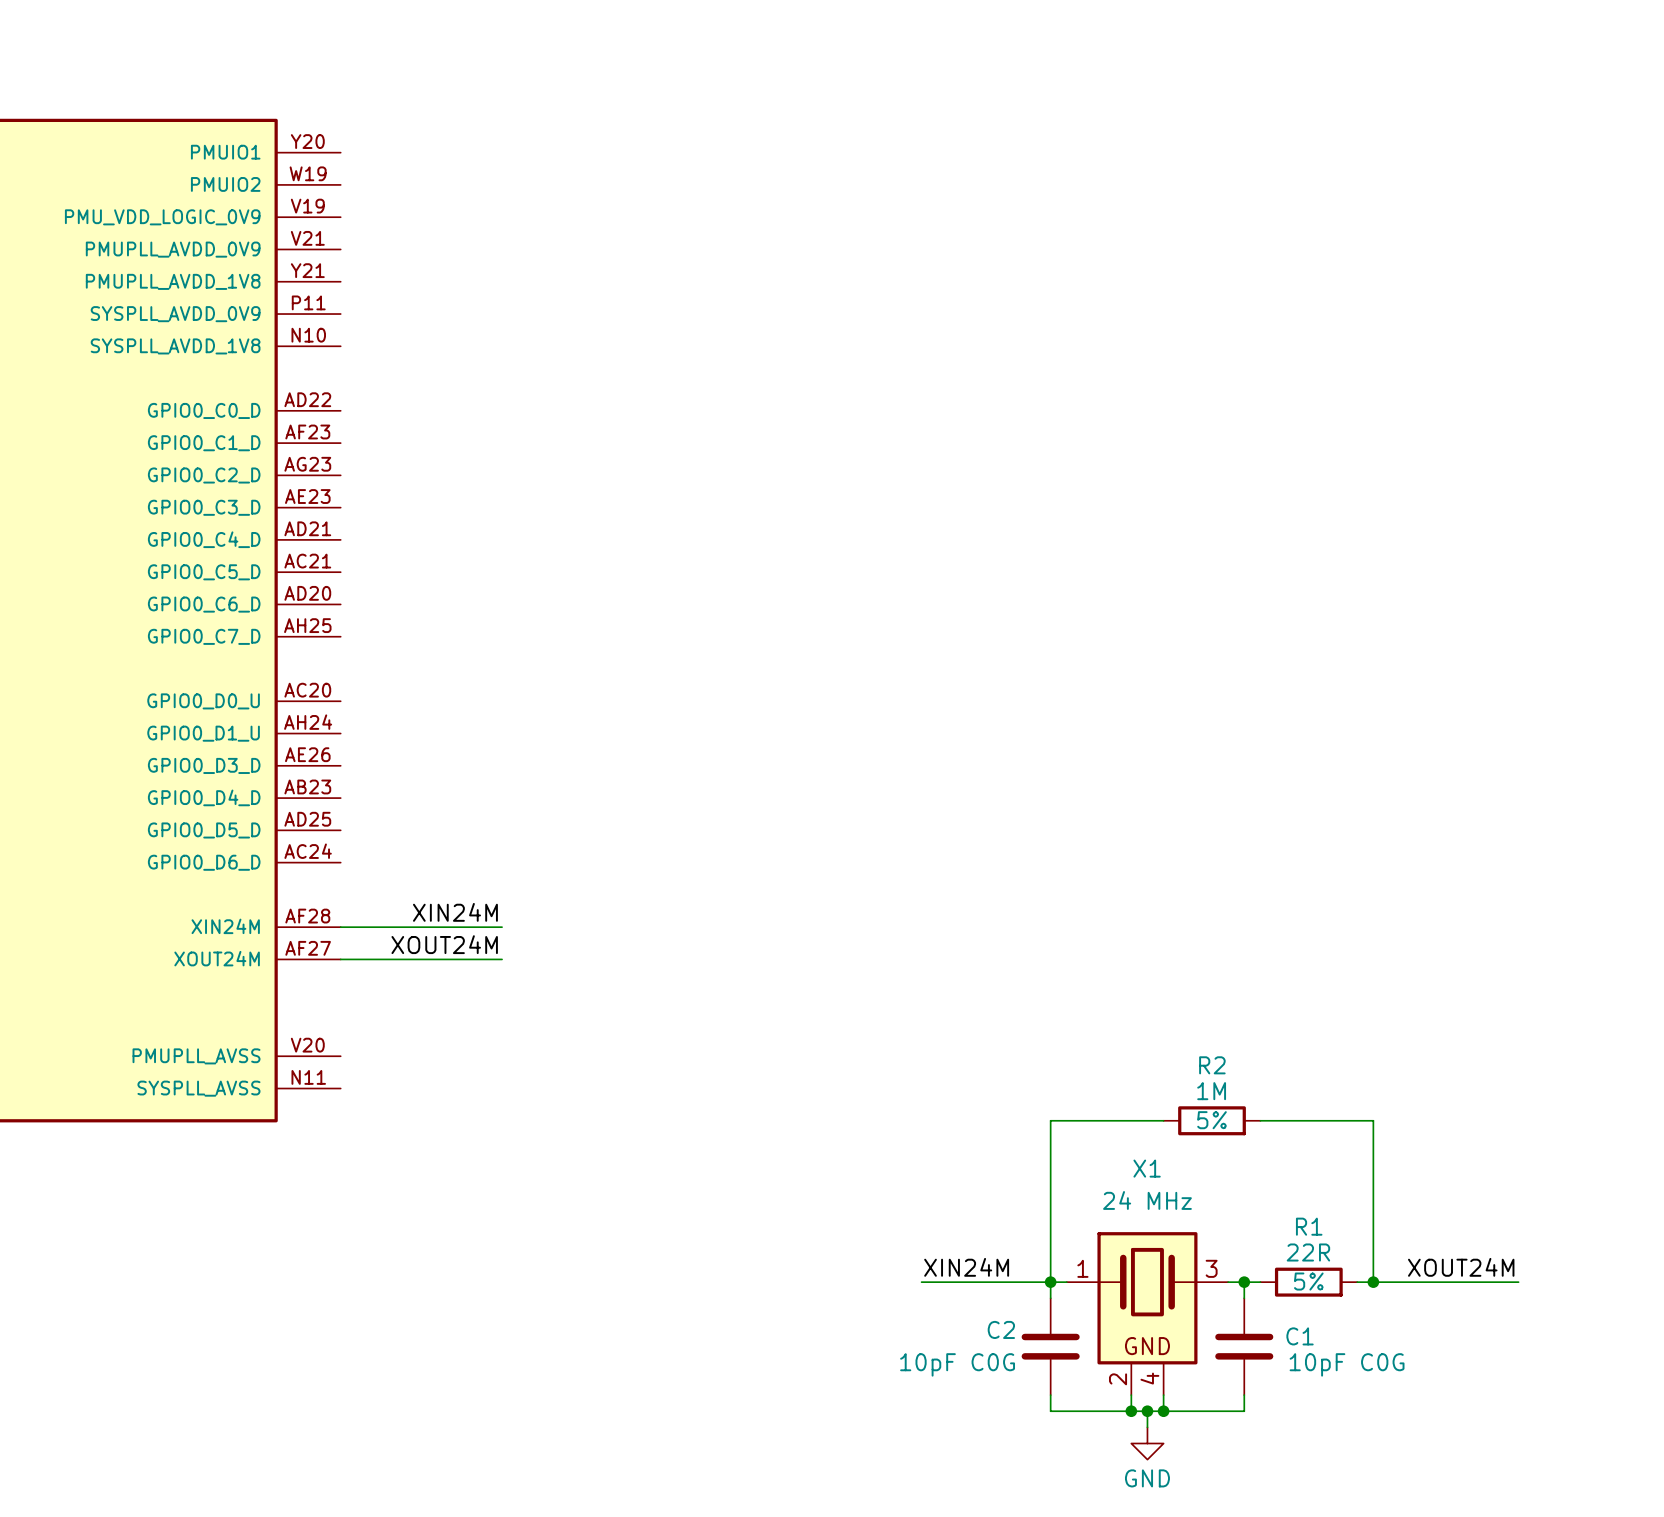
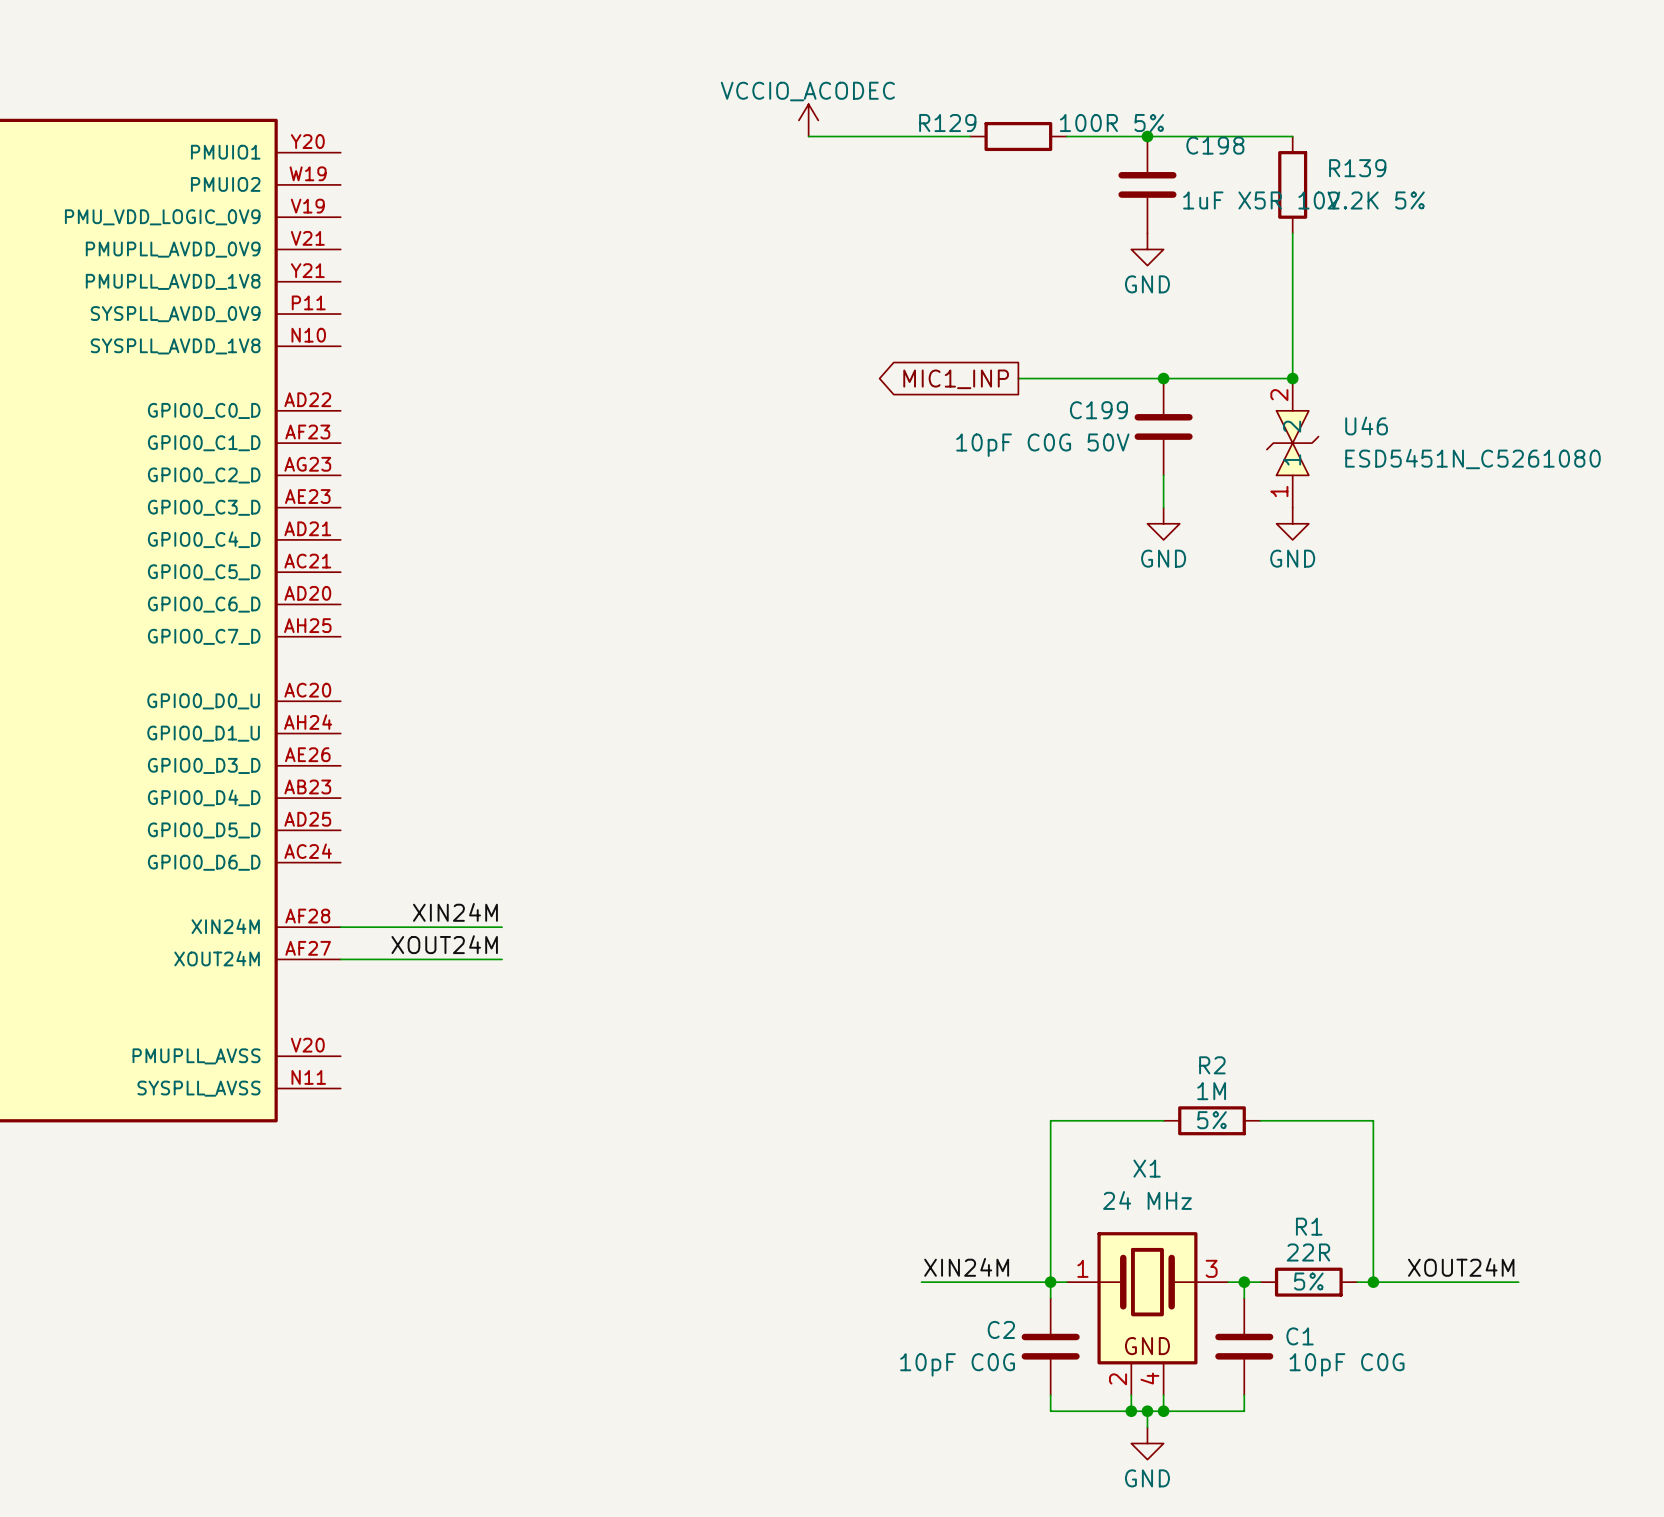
power symbol: none -> VCCIO_ACODEC (808, 120)
wire: none -> (808, 136) (969, 136)
R129: none -> 100R 5% (1018, 136)
wire: none -> (1066, 136) (1292, 136)
junction: none -> (1147, 136)
C198: none -> 1uF X5R 10V (1147, 184)
R139: none -> 2.2K 5% (1292, 184)
wire: none -> (1292, 233) (1292, 378) (1018, 378)
power symbol: none -> GND (1147, 249)
junction: none -> (1163, 378)
junction: none -> (1292, 378)
global label: none -> MIC1_INP (956, 379)
C199: none -> 10pF C0G 50V (1163, 426)
U46: none -> ESD5451N_C5261080 (1292, 443)
wire: none -> (1163, 475) (1163, 507)
power symbol: none -> GND (1163, 523)
power symbol: none -> GND (1292, 523)

